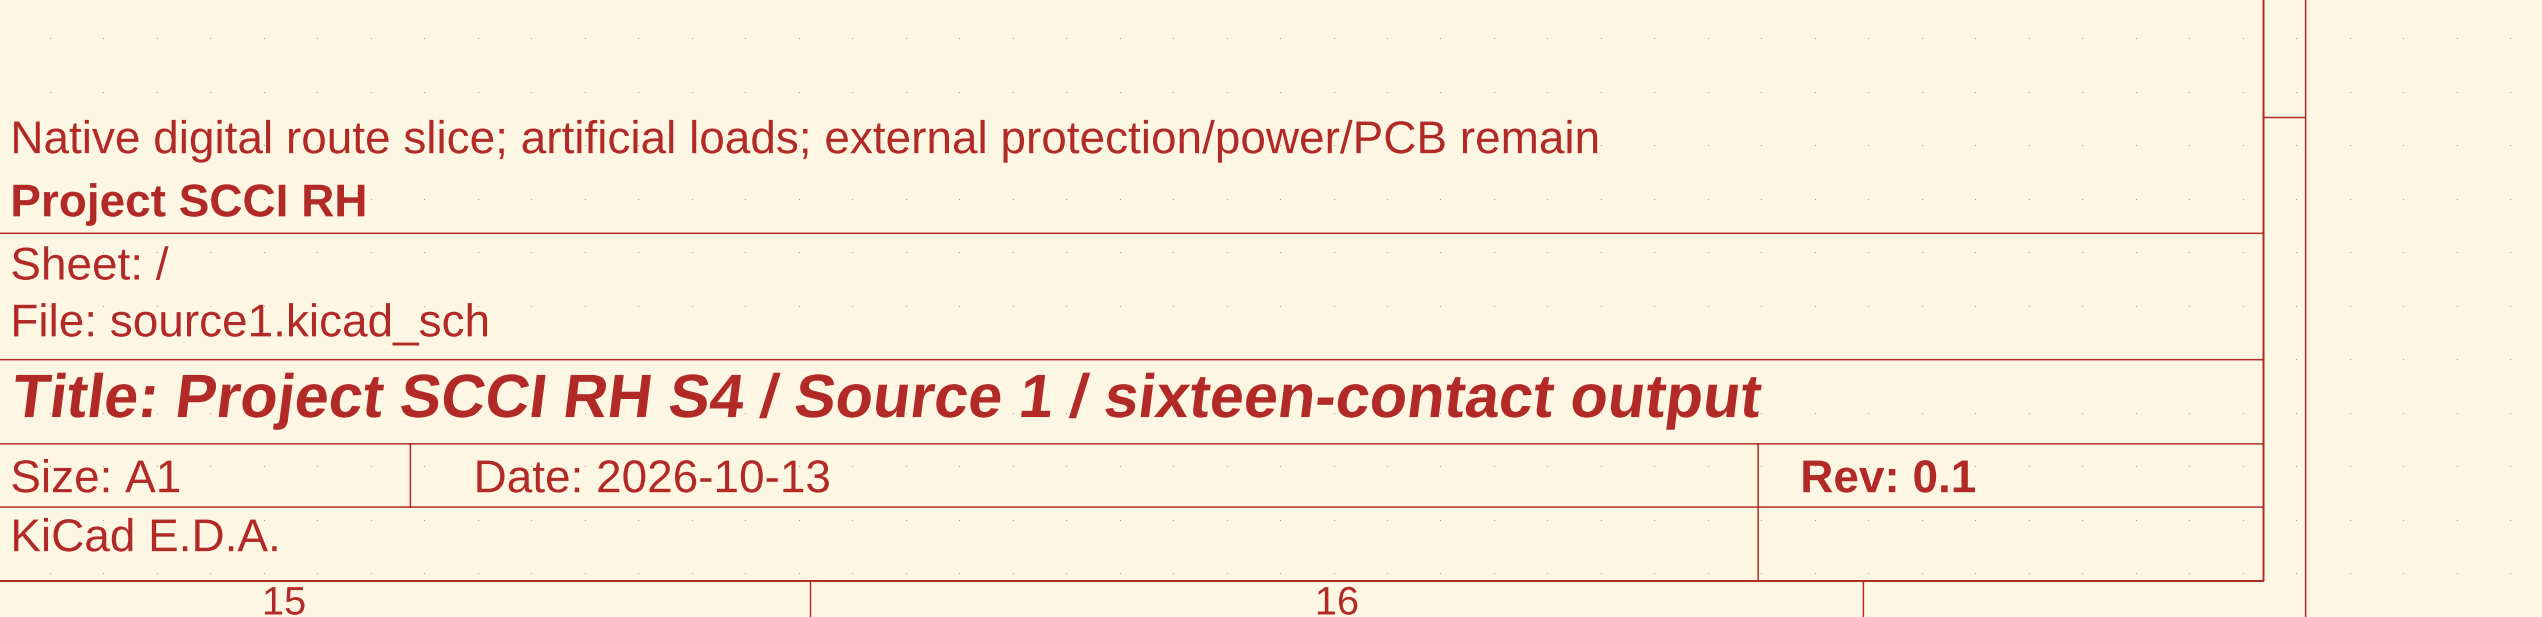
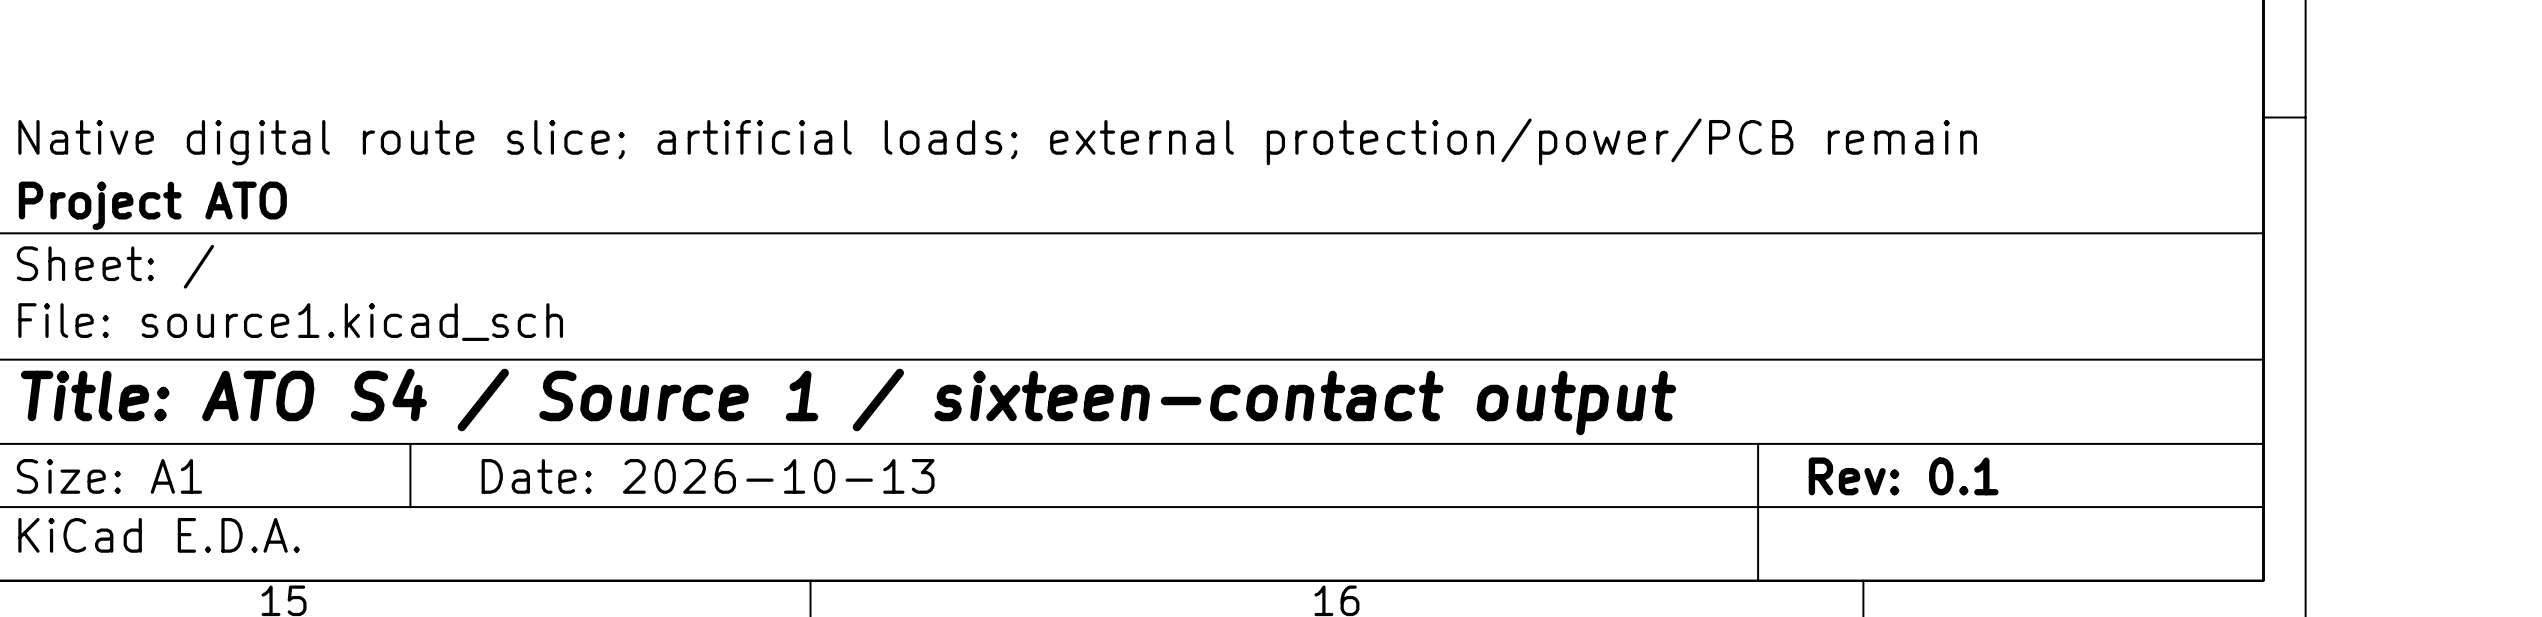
title block: Project SCCI RH (188, 204) -> Project ATO (152, 205)
title block: Title: Project SCCI RH S4 / Source 1 / sixteen-contact output (888, 401) -> Title: ATO S4 / Source 1 / sixteen-contact output (848, 402)

